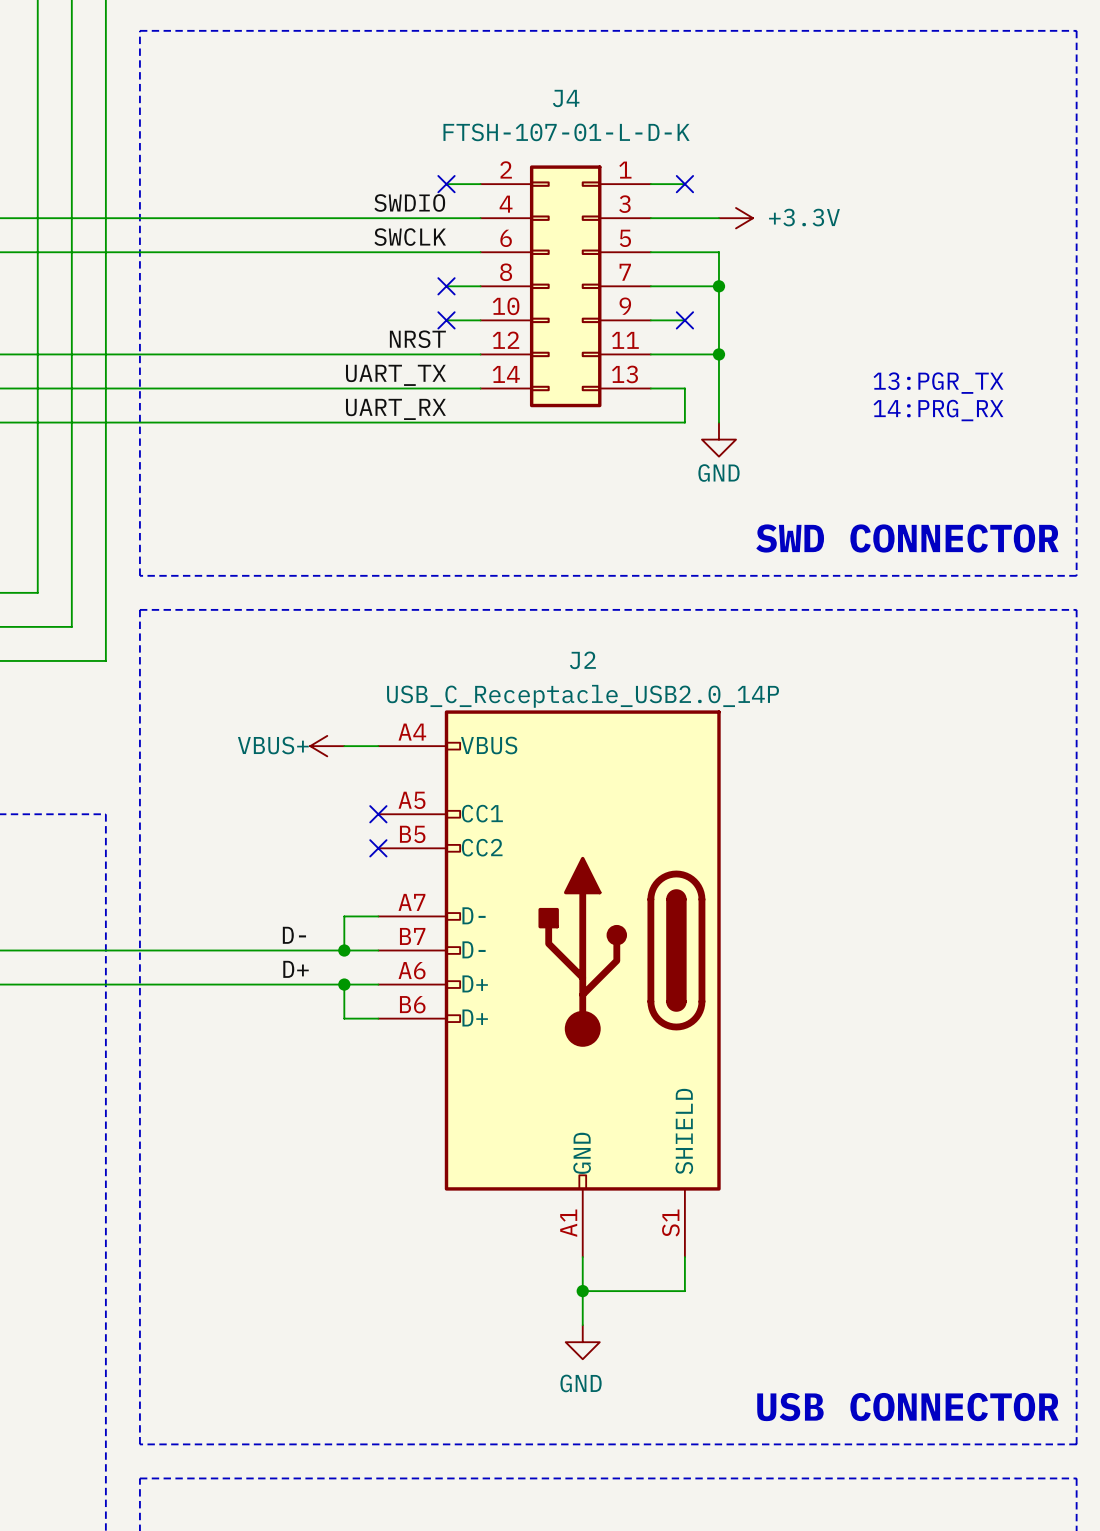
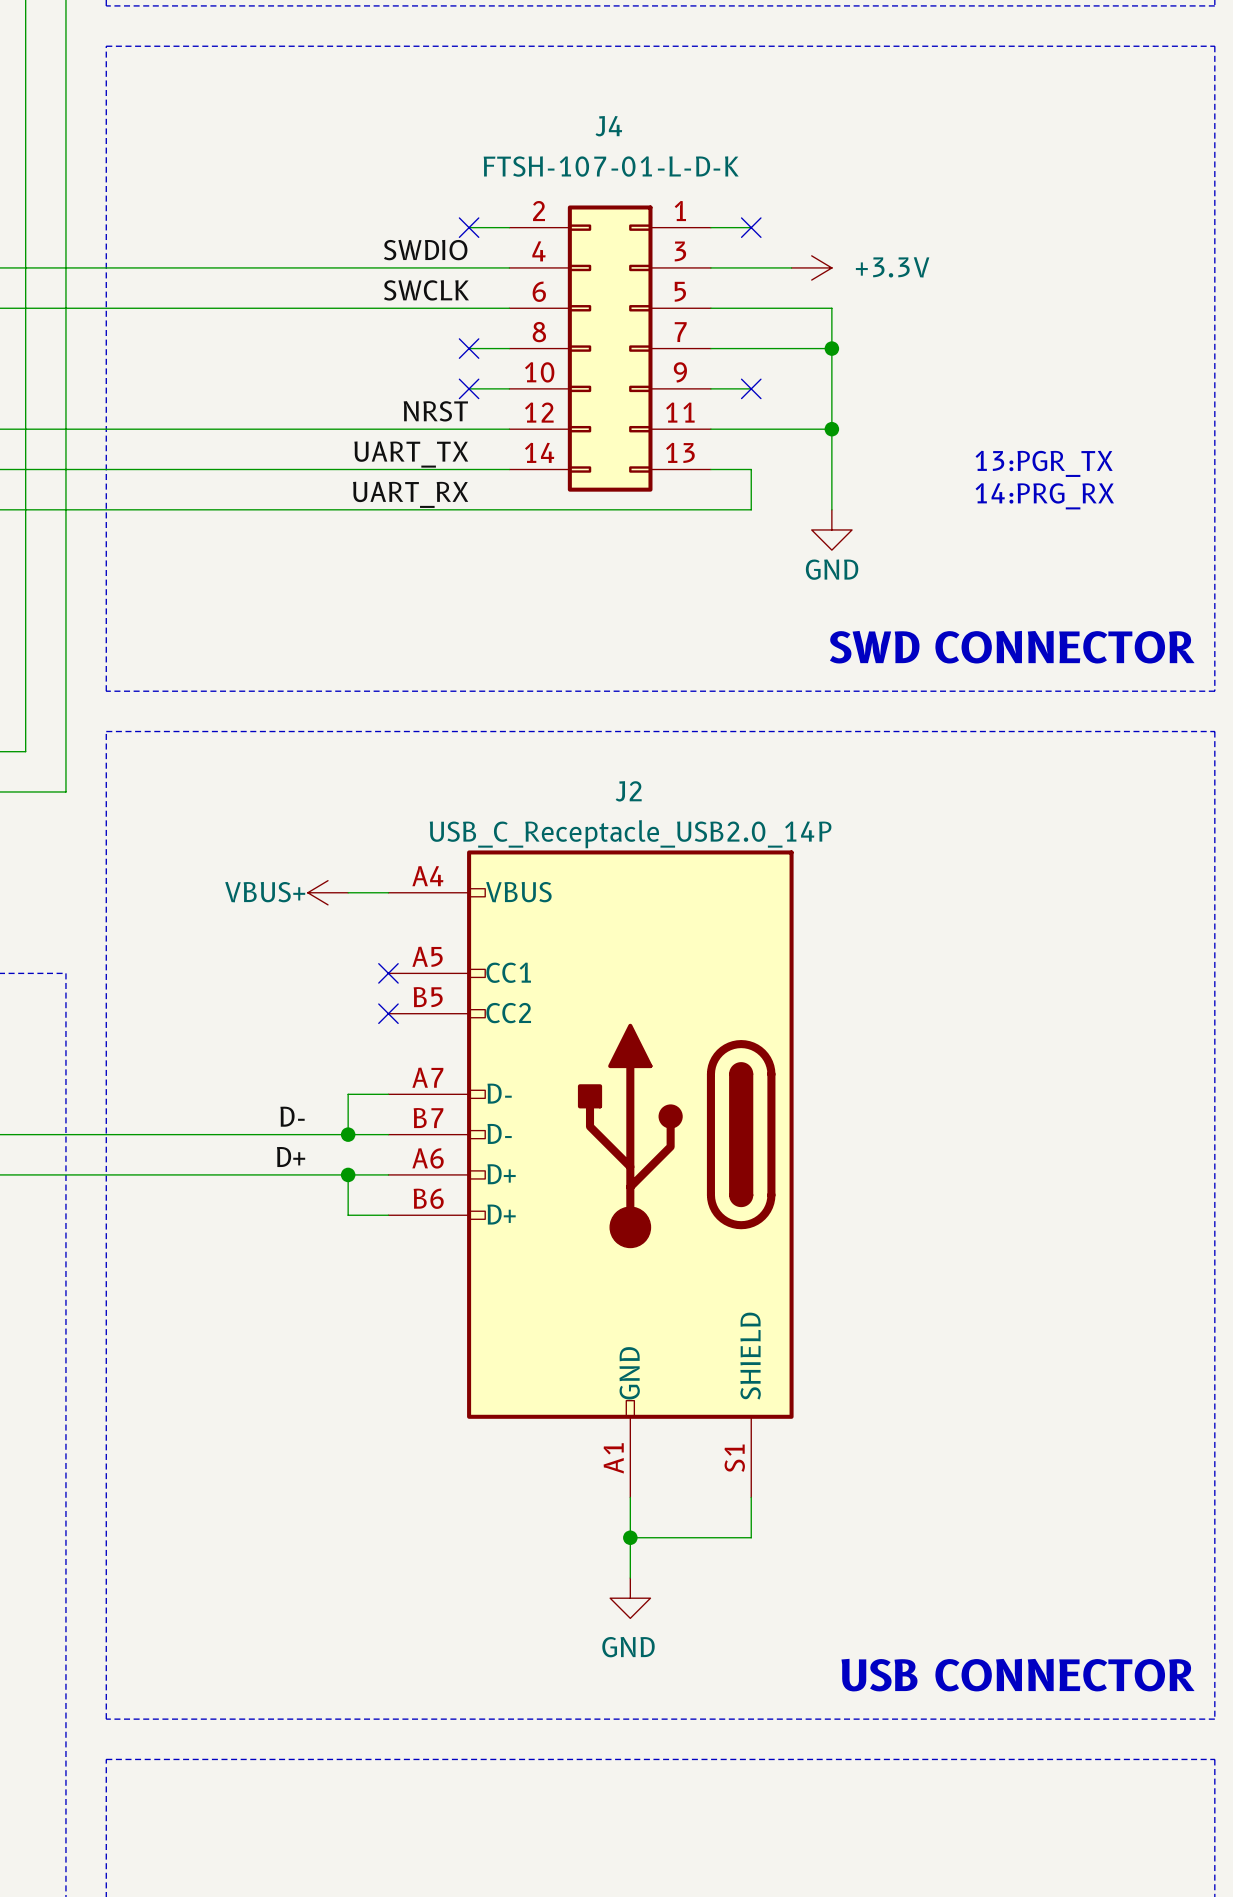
wire: (718, 252) (718, 422) -> (791, 308) (831, 308) (831, 509)
wire: none -> (791, 348) (831, 348)
junction position: (718, 286) -> (831, 348)
wire: none -> (791, 429) (831, 429)
junction position: (718, 354) -> (831, 429)
power symbol position: GND (718, 439) -> GND (831, 529)

